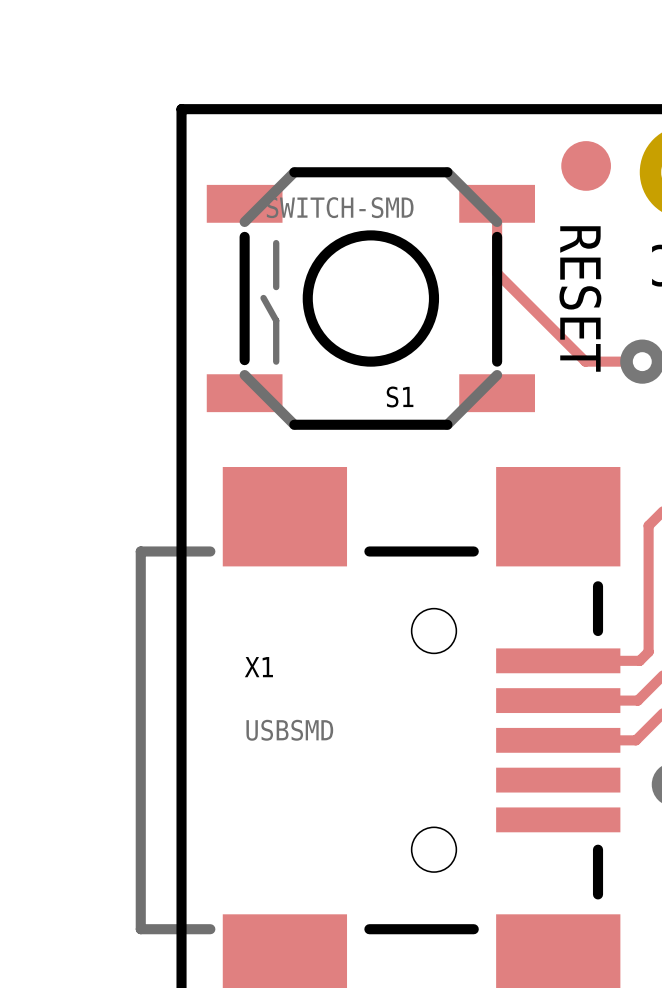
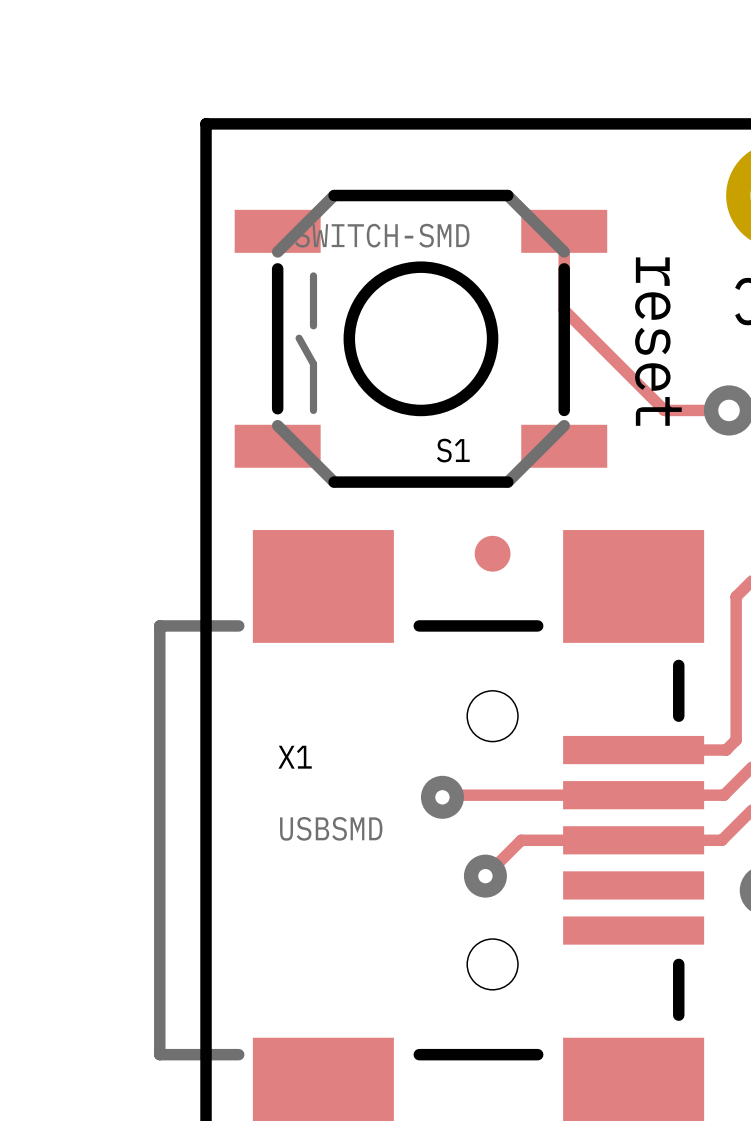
part: (586, 165) -> none
text: RESET (580, 298) -> reset (658, 341)
part: none -> (492, 553)
track: none -> (633, 795) (444, 795) (442, 797)
via: none -> (442, 797)
track: none -> (633, 840) (521, 840) (485, 876)
via: none -> (485, 876)

